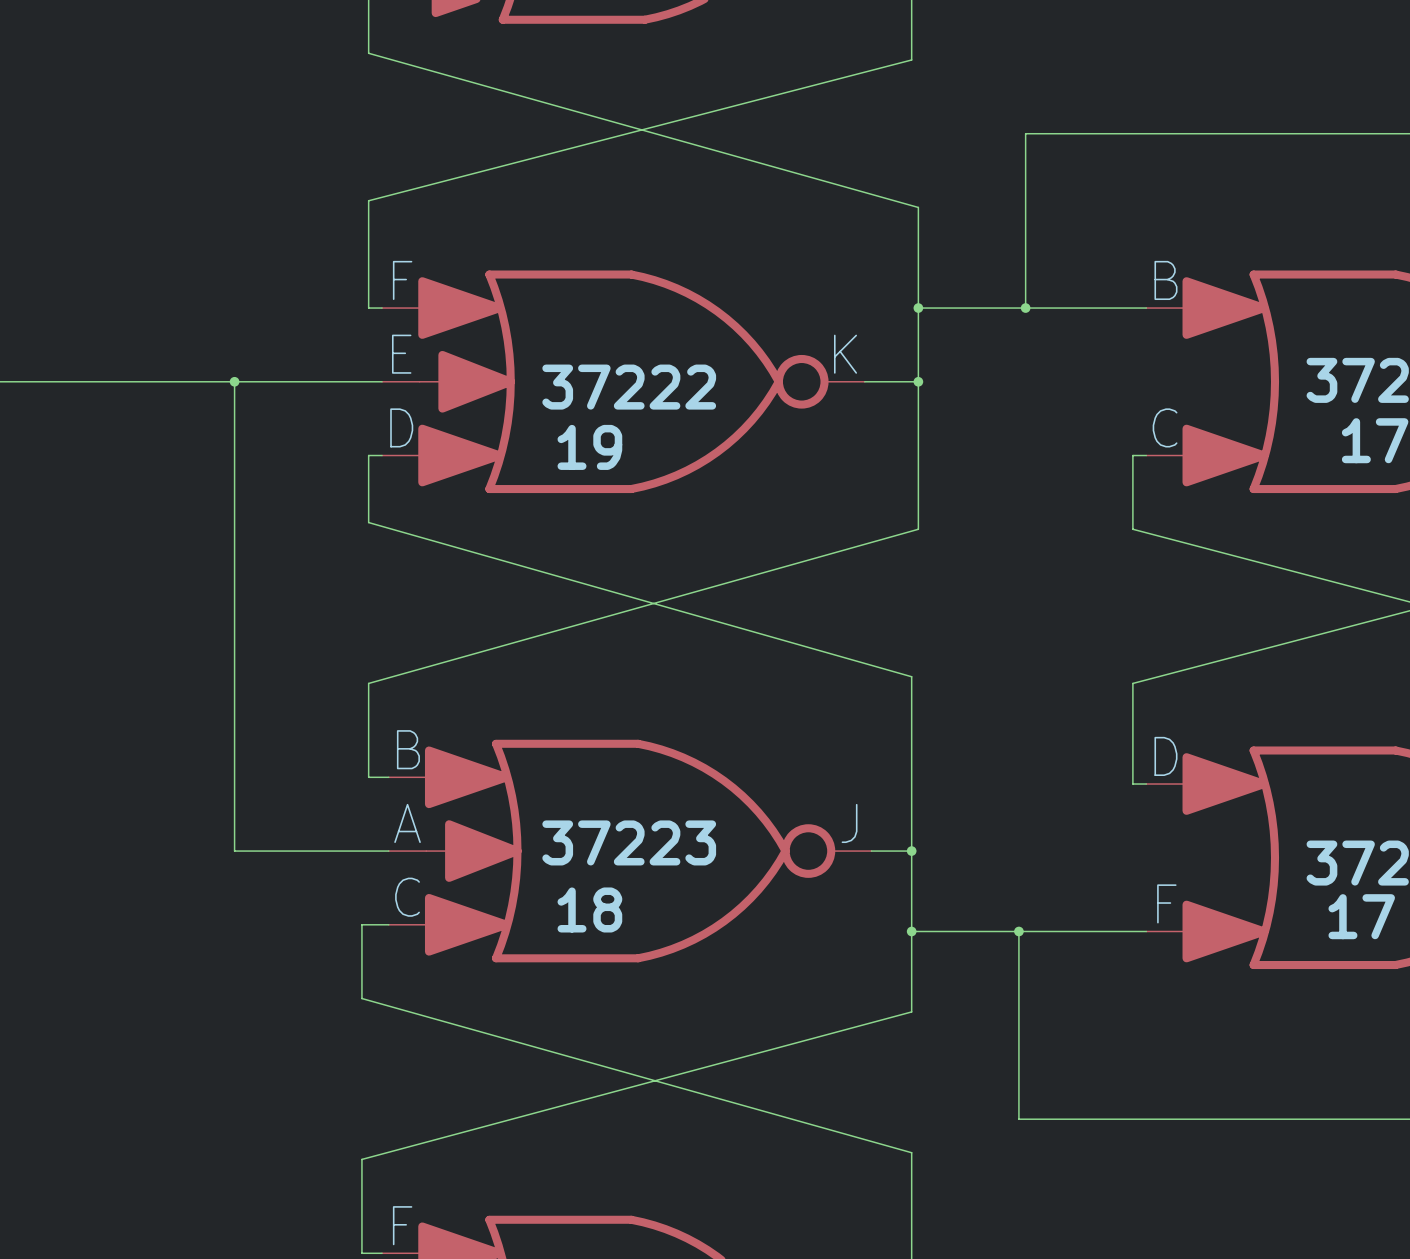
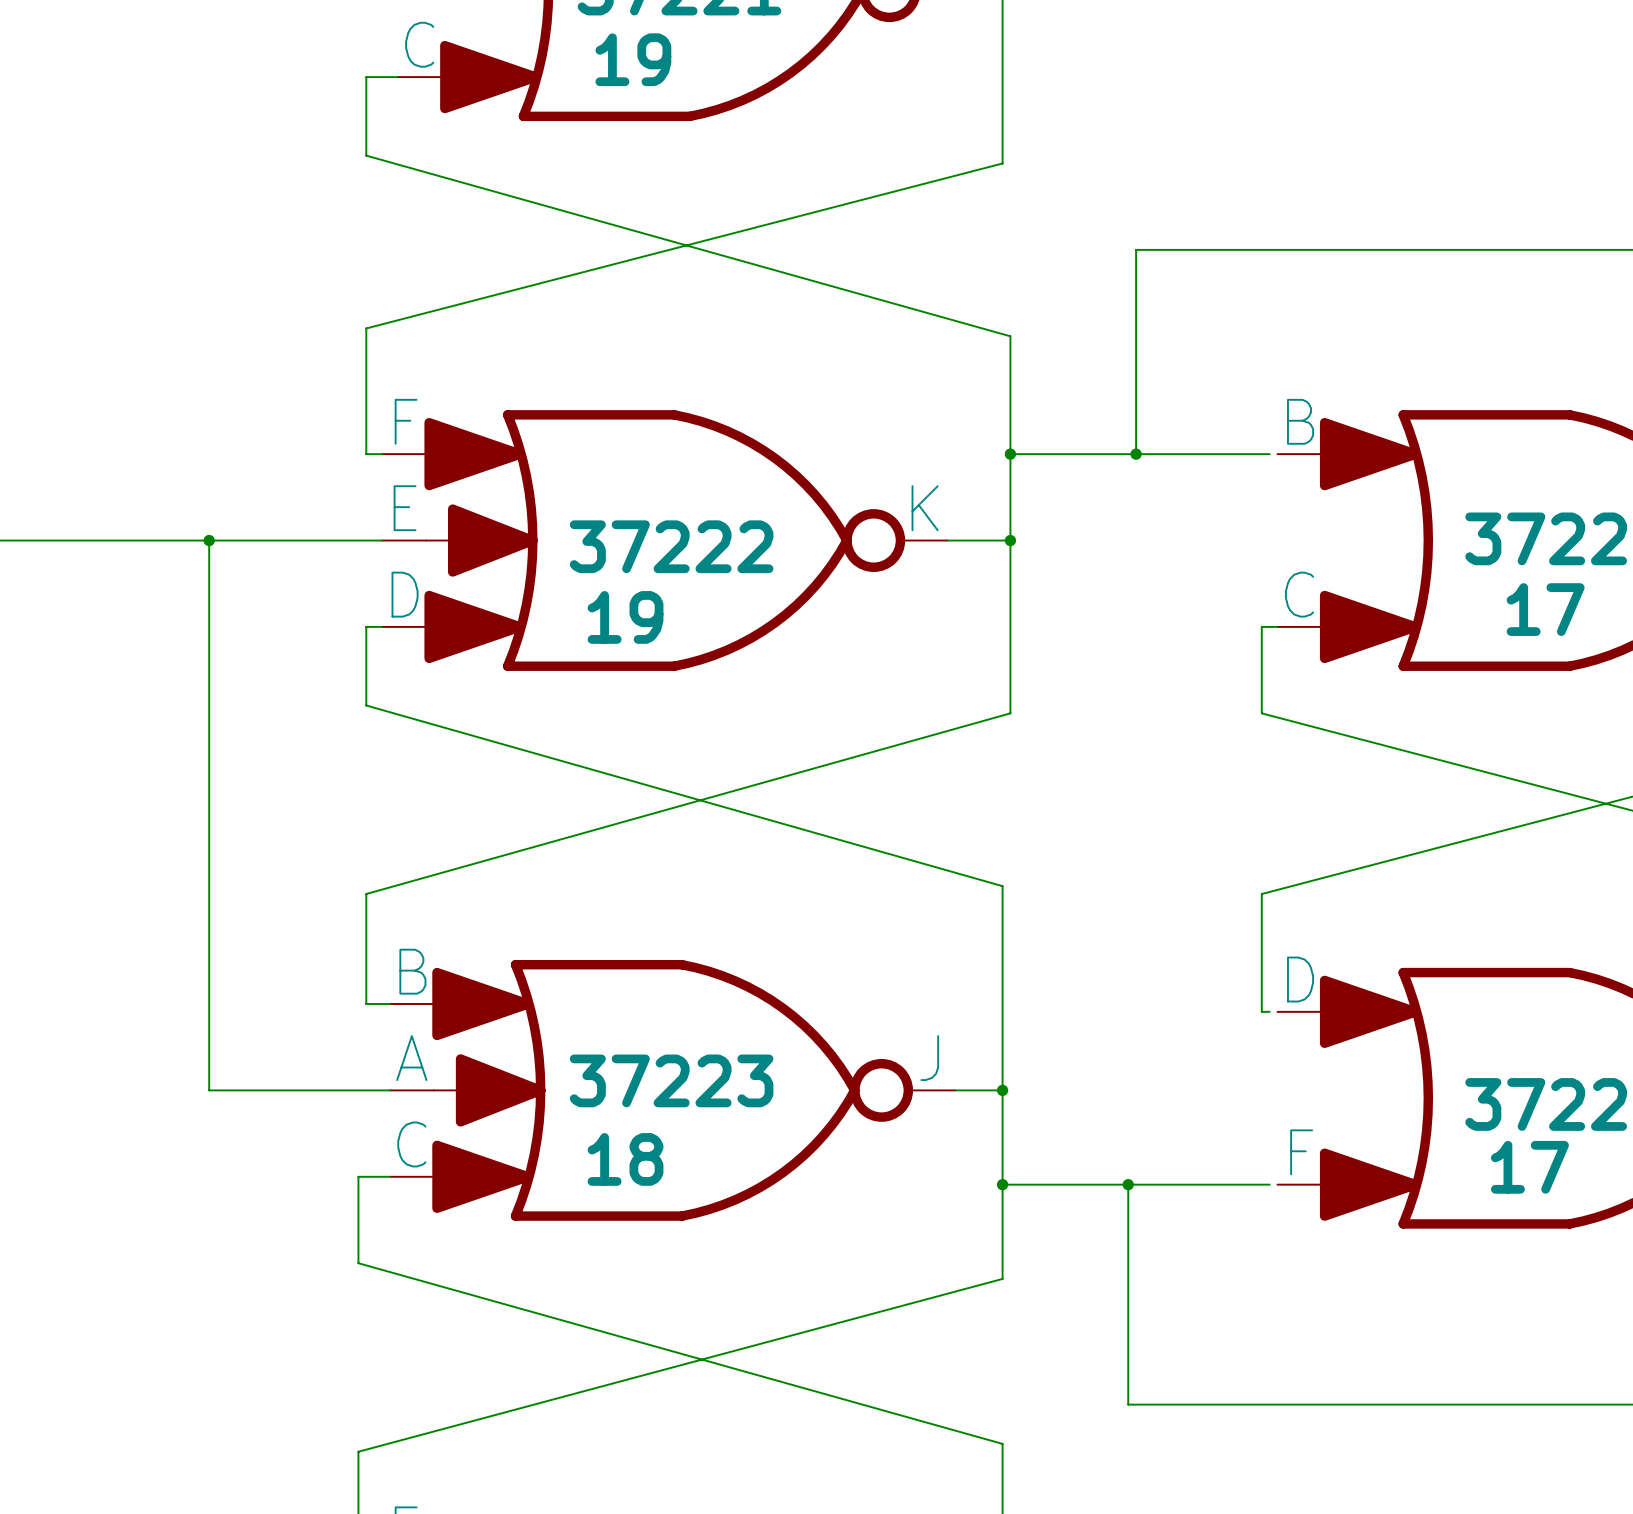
wire: (1139, 308) (1146, 308) -> none
wire: (1139, 784) (1146, 784) -> none
wire: (1139, 931) (1146, 931) -> none

